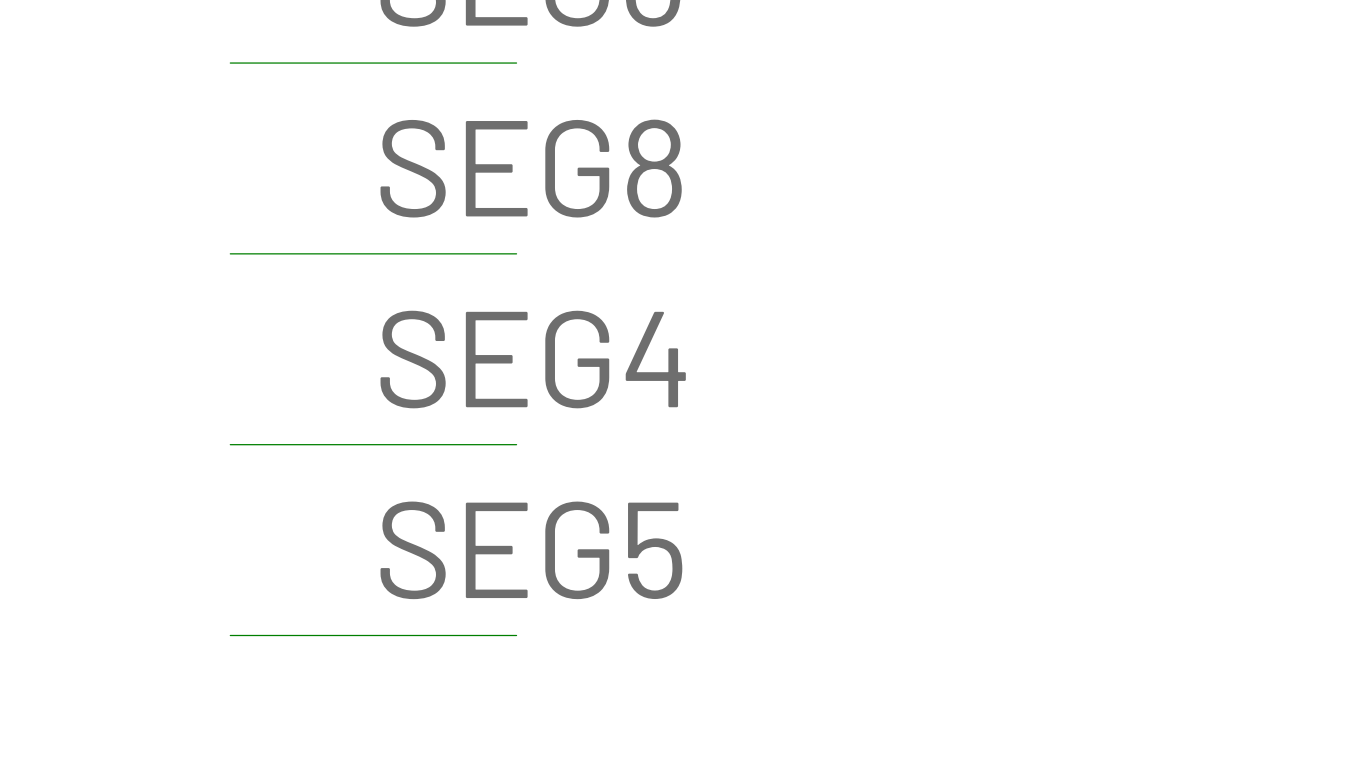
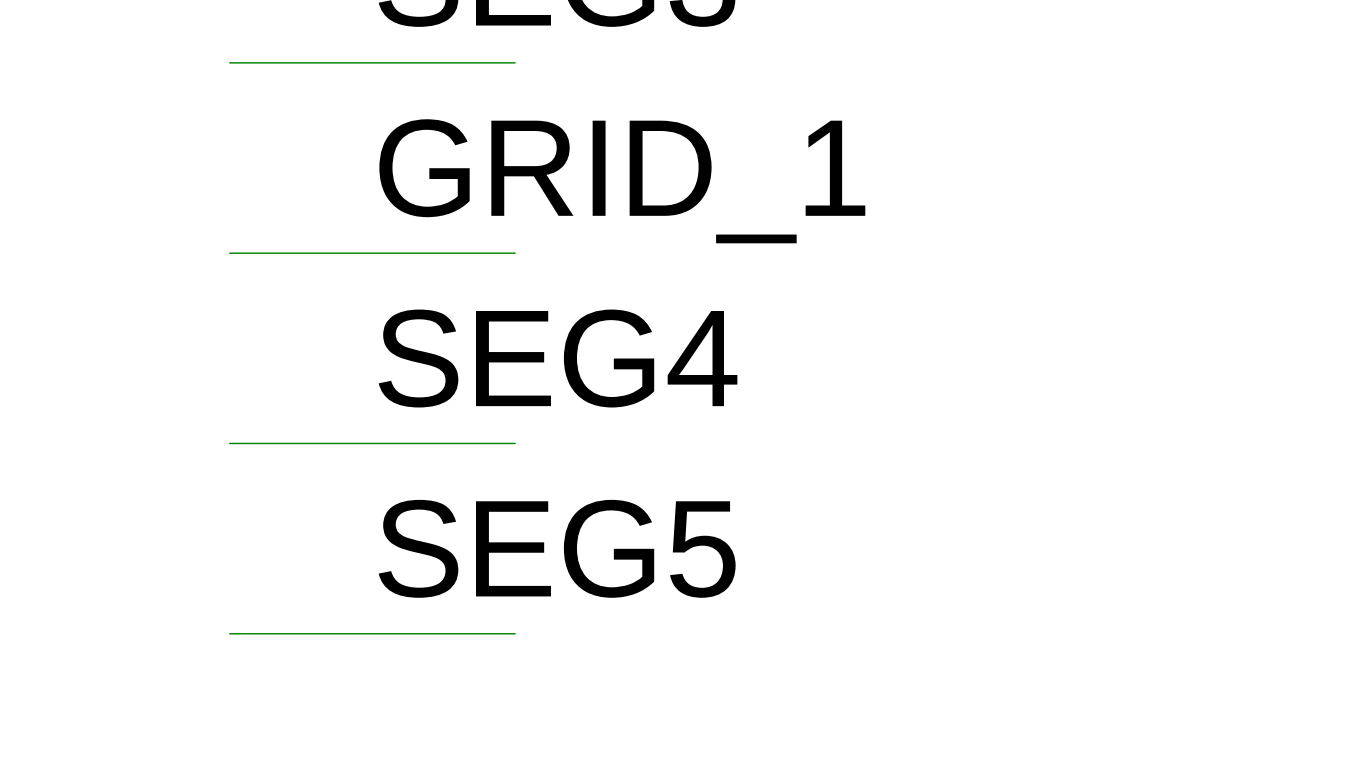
label: SEG8 (531, 168) -> GRID_1 (622, 181)

